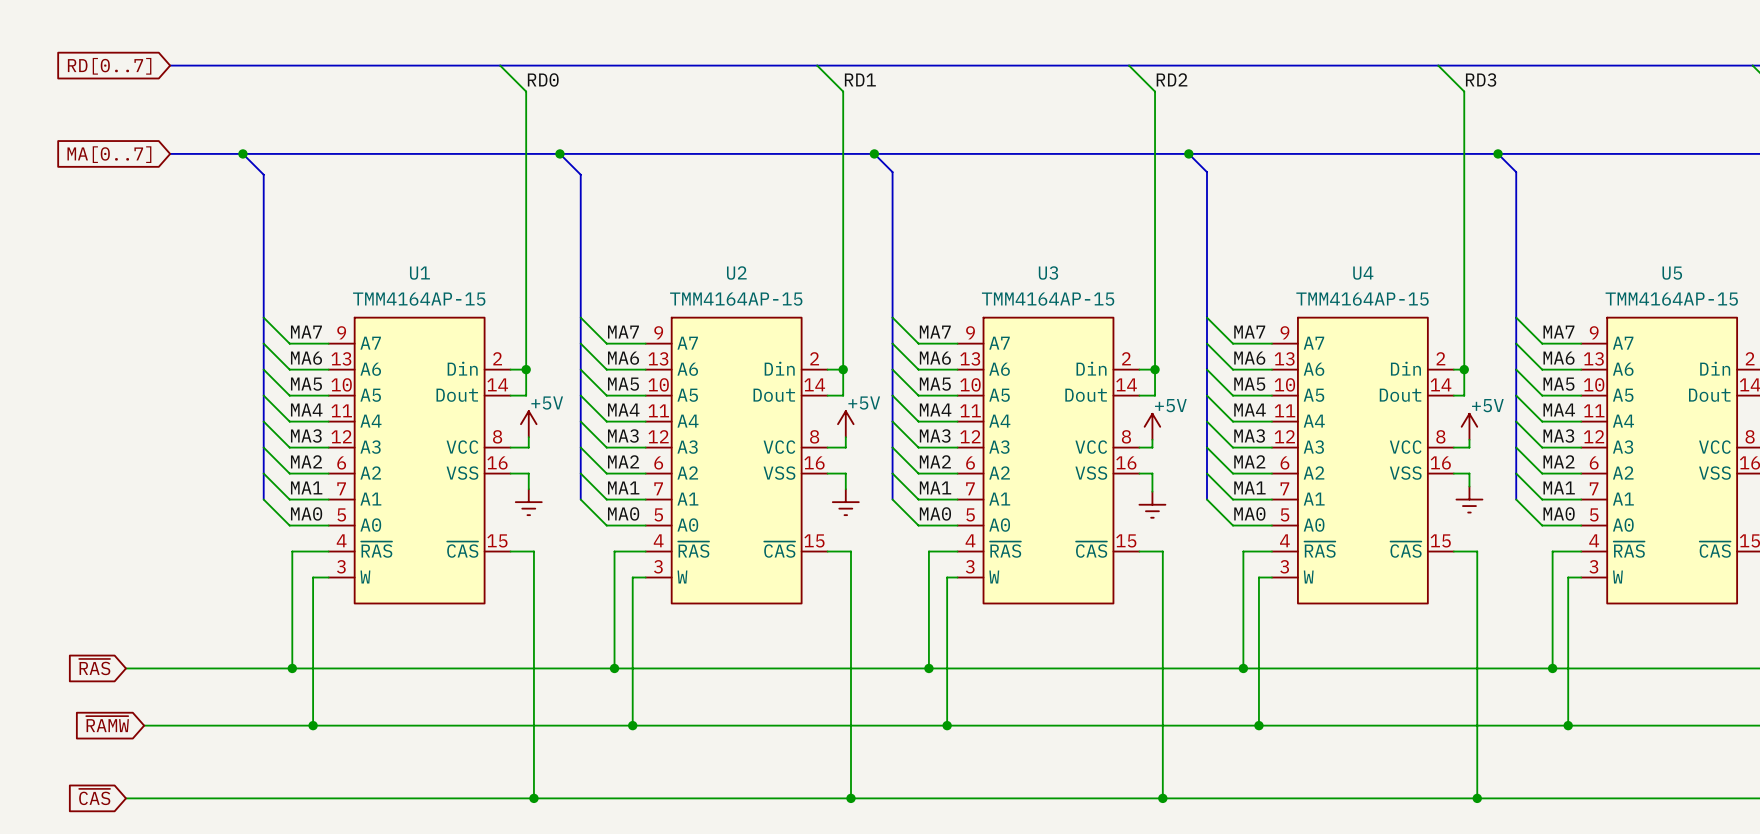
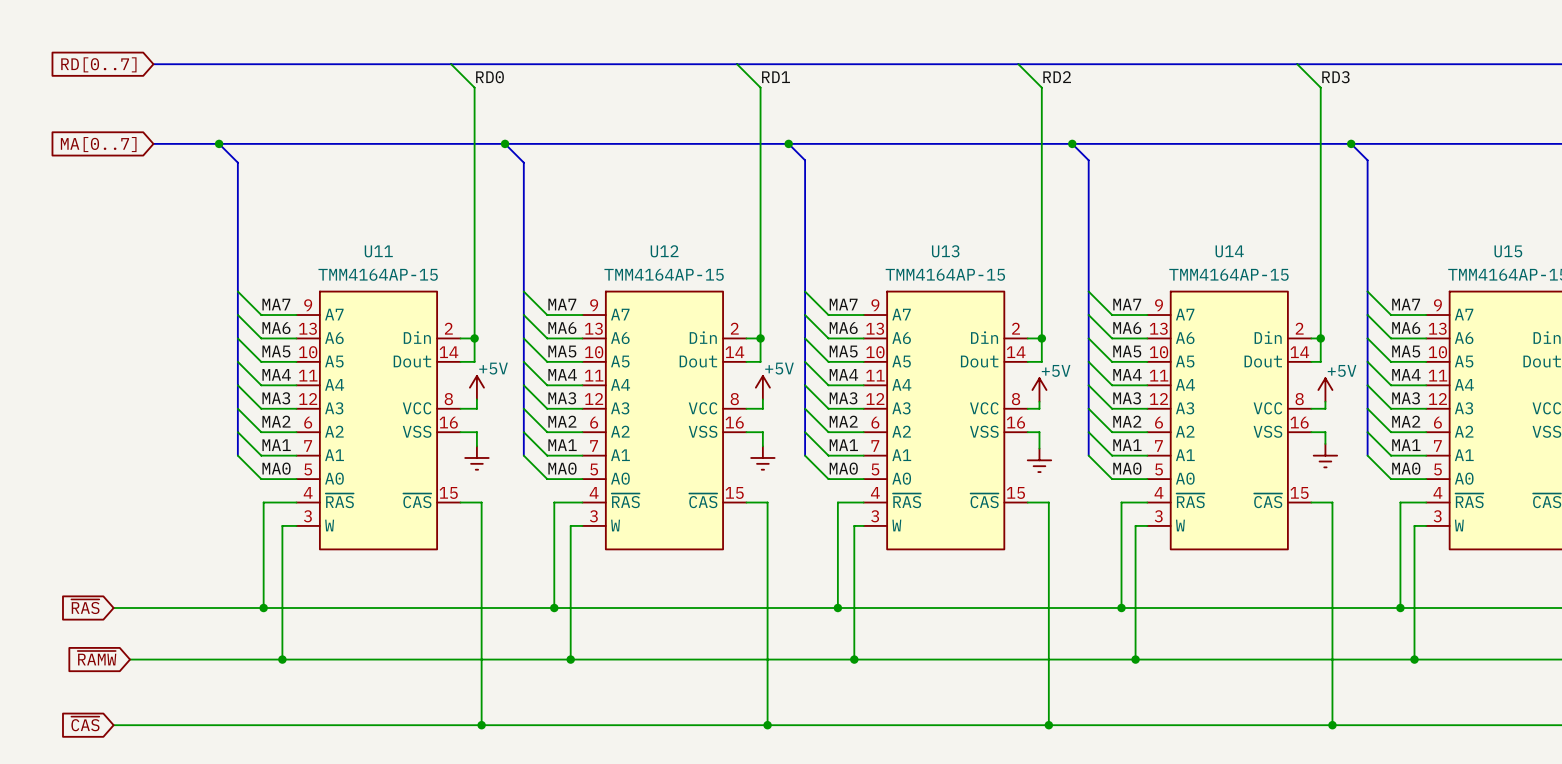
U2 name: U2 (736, 272) -> U12 (664, 251)
U3 name: U3 (1048, 272) -> U13 (945, 251)
U1 name: U1 (419, 273) -> U11 (378, 251)
U4 name: U4 (1363, 273) -> U14 (1229, 251)
U5 name: U5 (1672, 273) -> U15 (1508, 251)

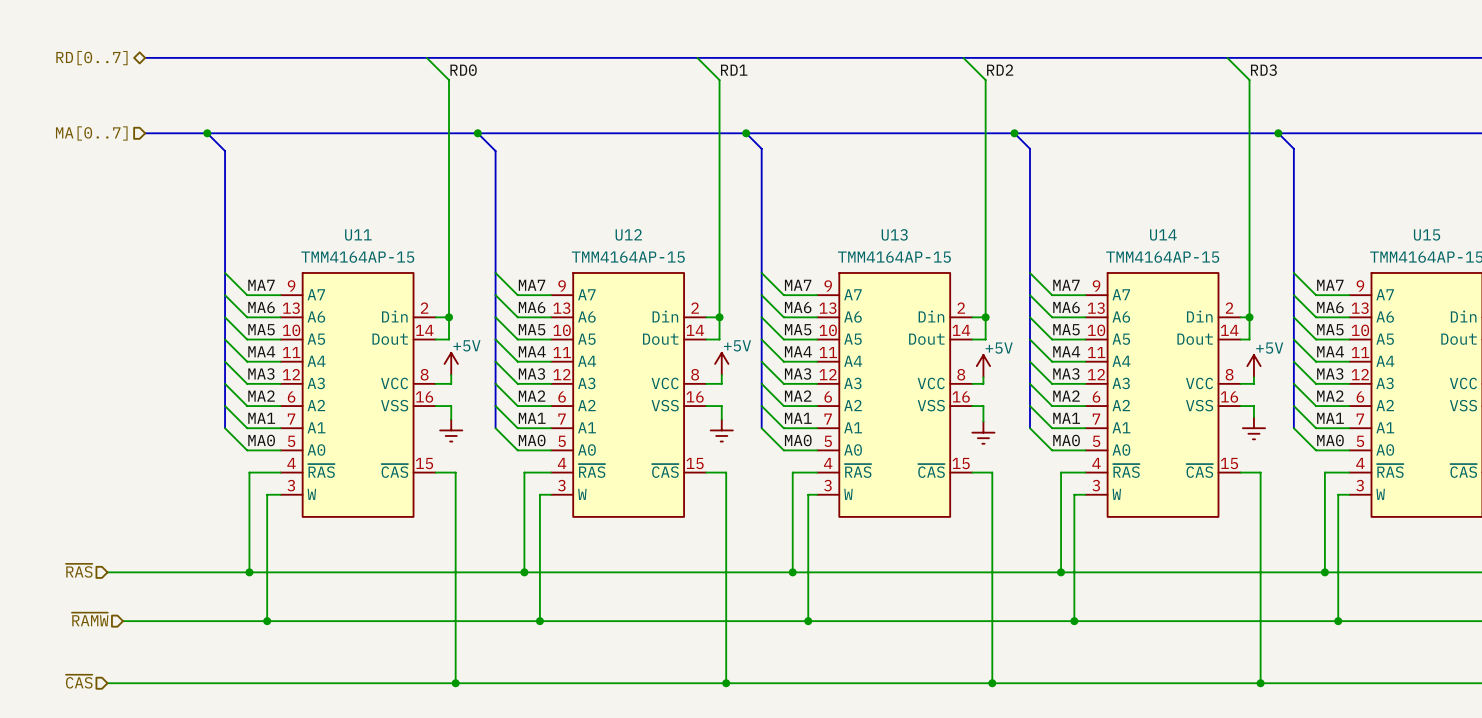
hierarchical label: none -> RD[0..7] (91, 58)
global label: RD[0..7] (98, 64) -> none
hierarchical label: none -> MA[0..7] (91, 133)
global label: MA[0..7] (98, 144) -> none
hierarchical label: none -> ~{RAS} (79, 570)
global label: ~{RAS} (85, 606) -> none
hierarchical label: none -> ~{RAMW} (90, 619)
global label: ~{RAMW} (97, 658) -> none
hierarchical label: none -> ~{CAS} (79, 681)
global label: ~{CAS} (85, 723) -> none

